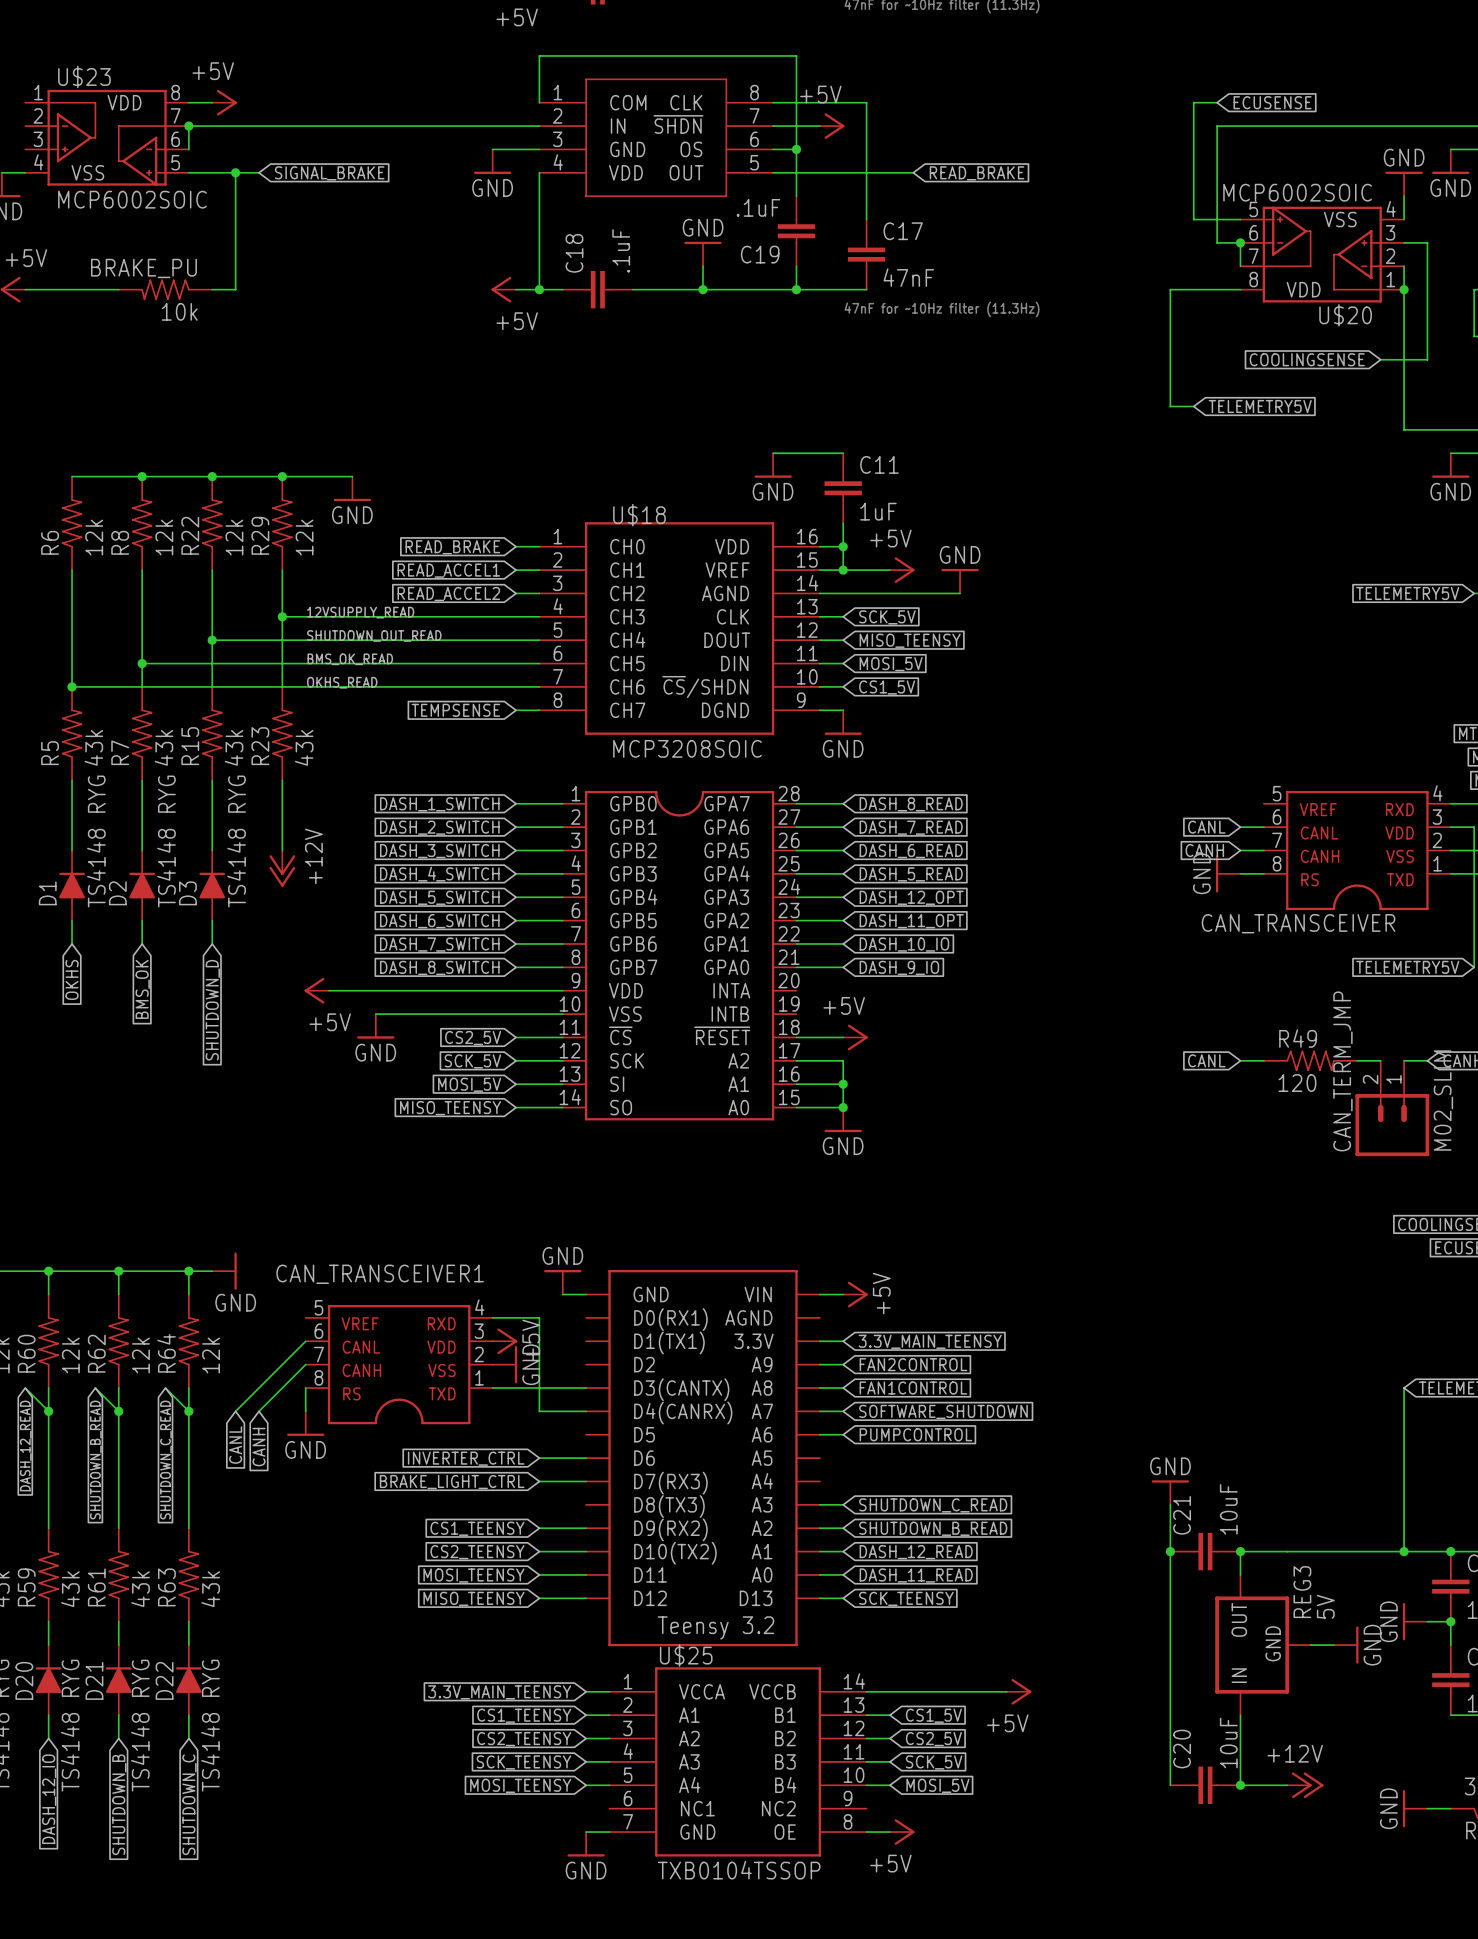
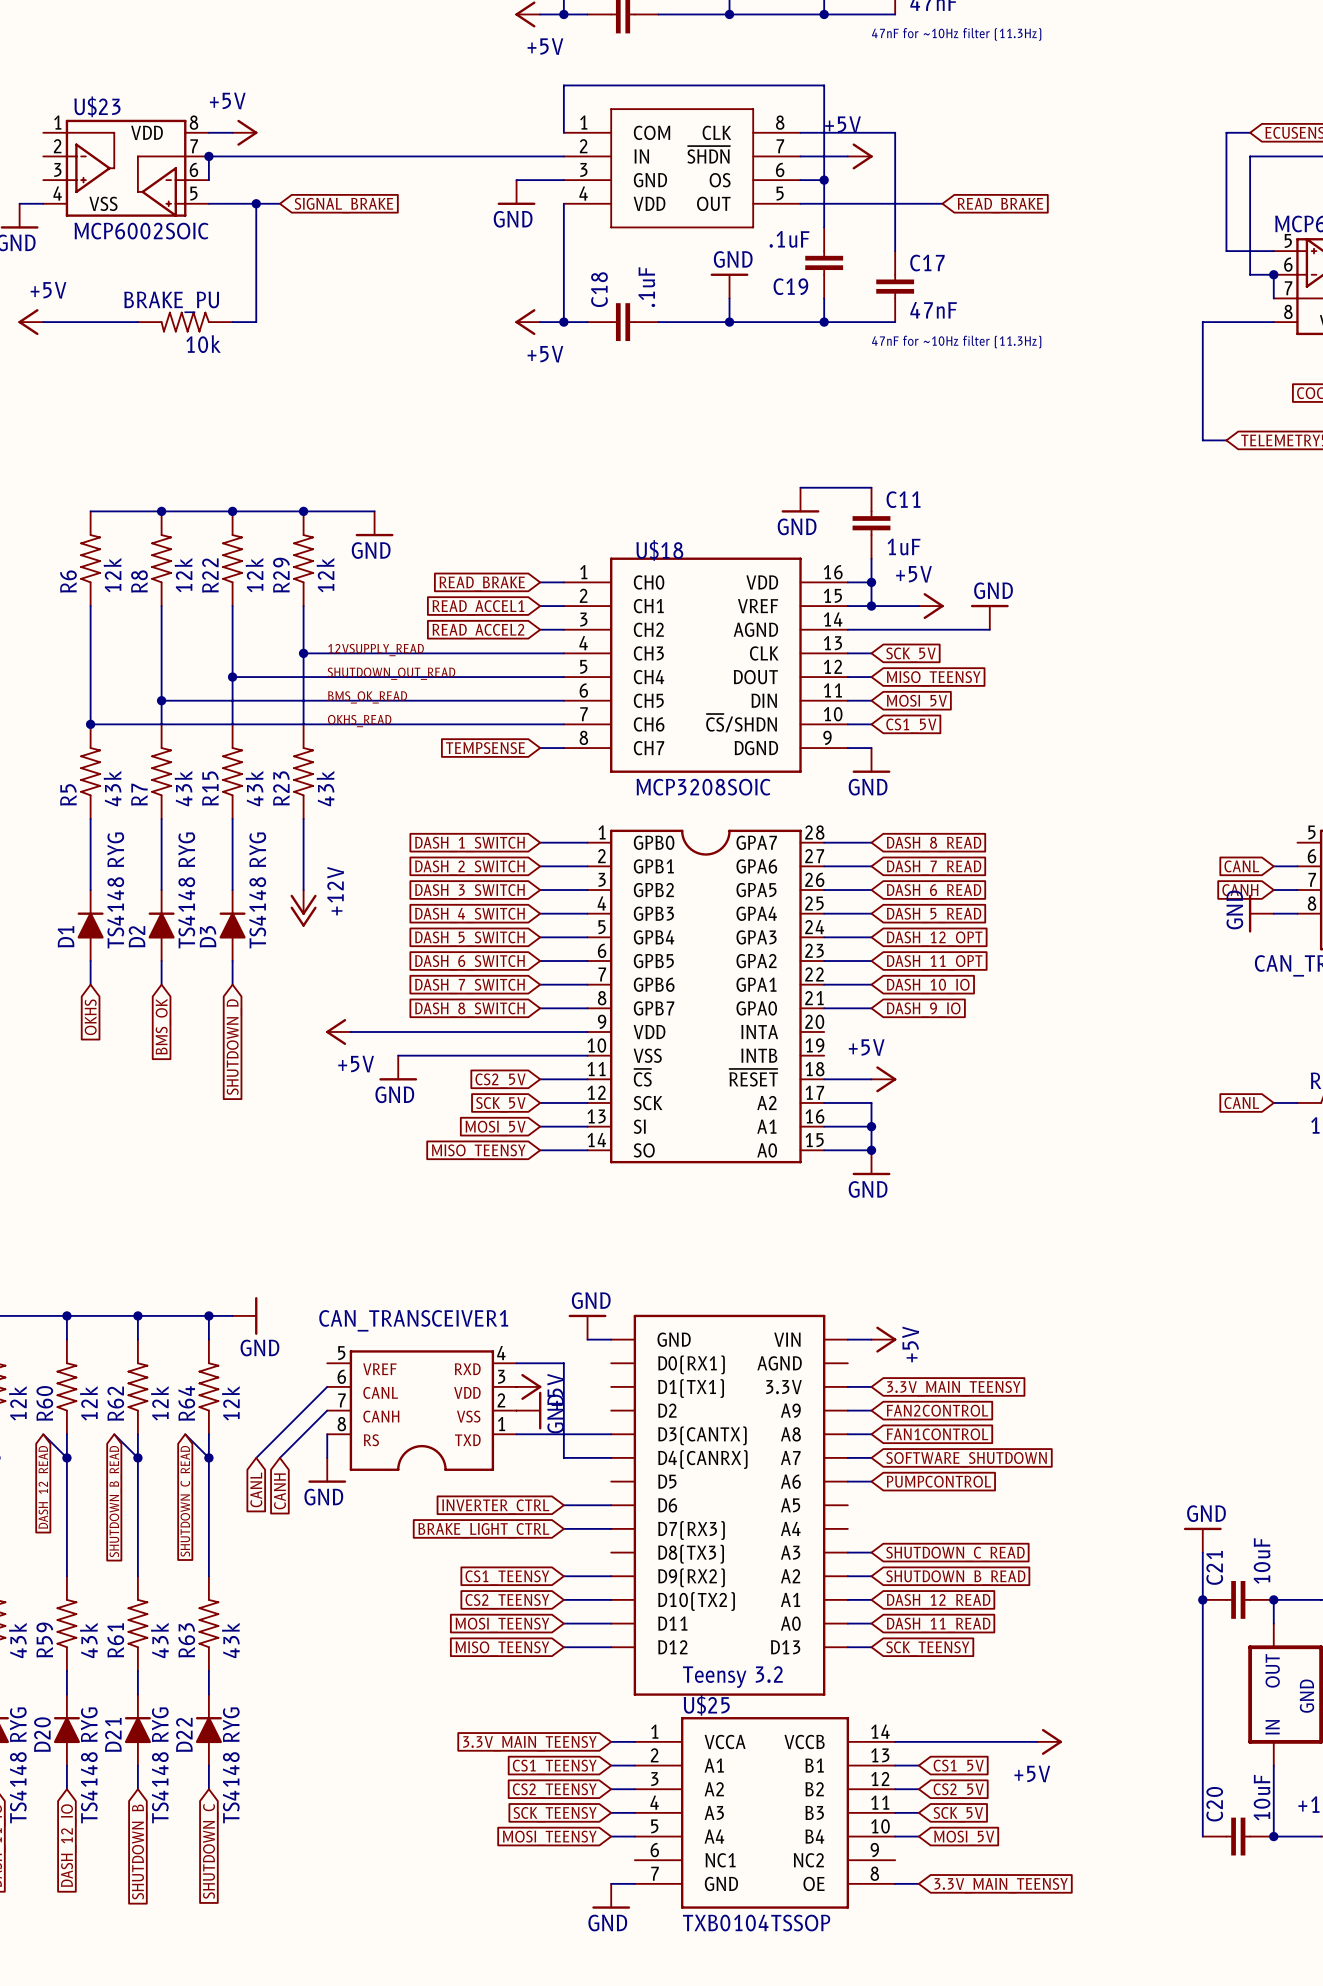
power symbol: +5V (902, 1832) -> none
global label: none -> 3.3V_MAIN_TEENSY (1001, 1885)

